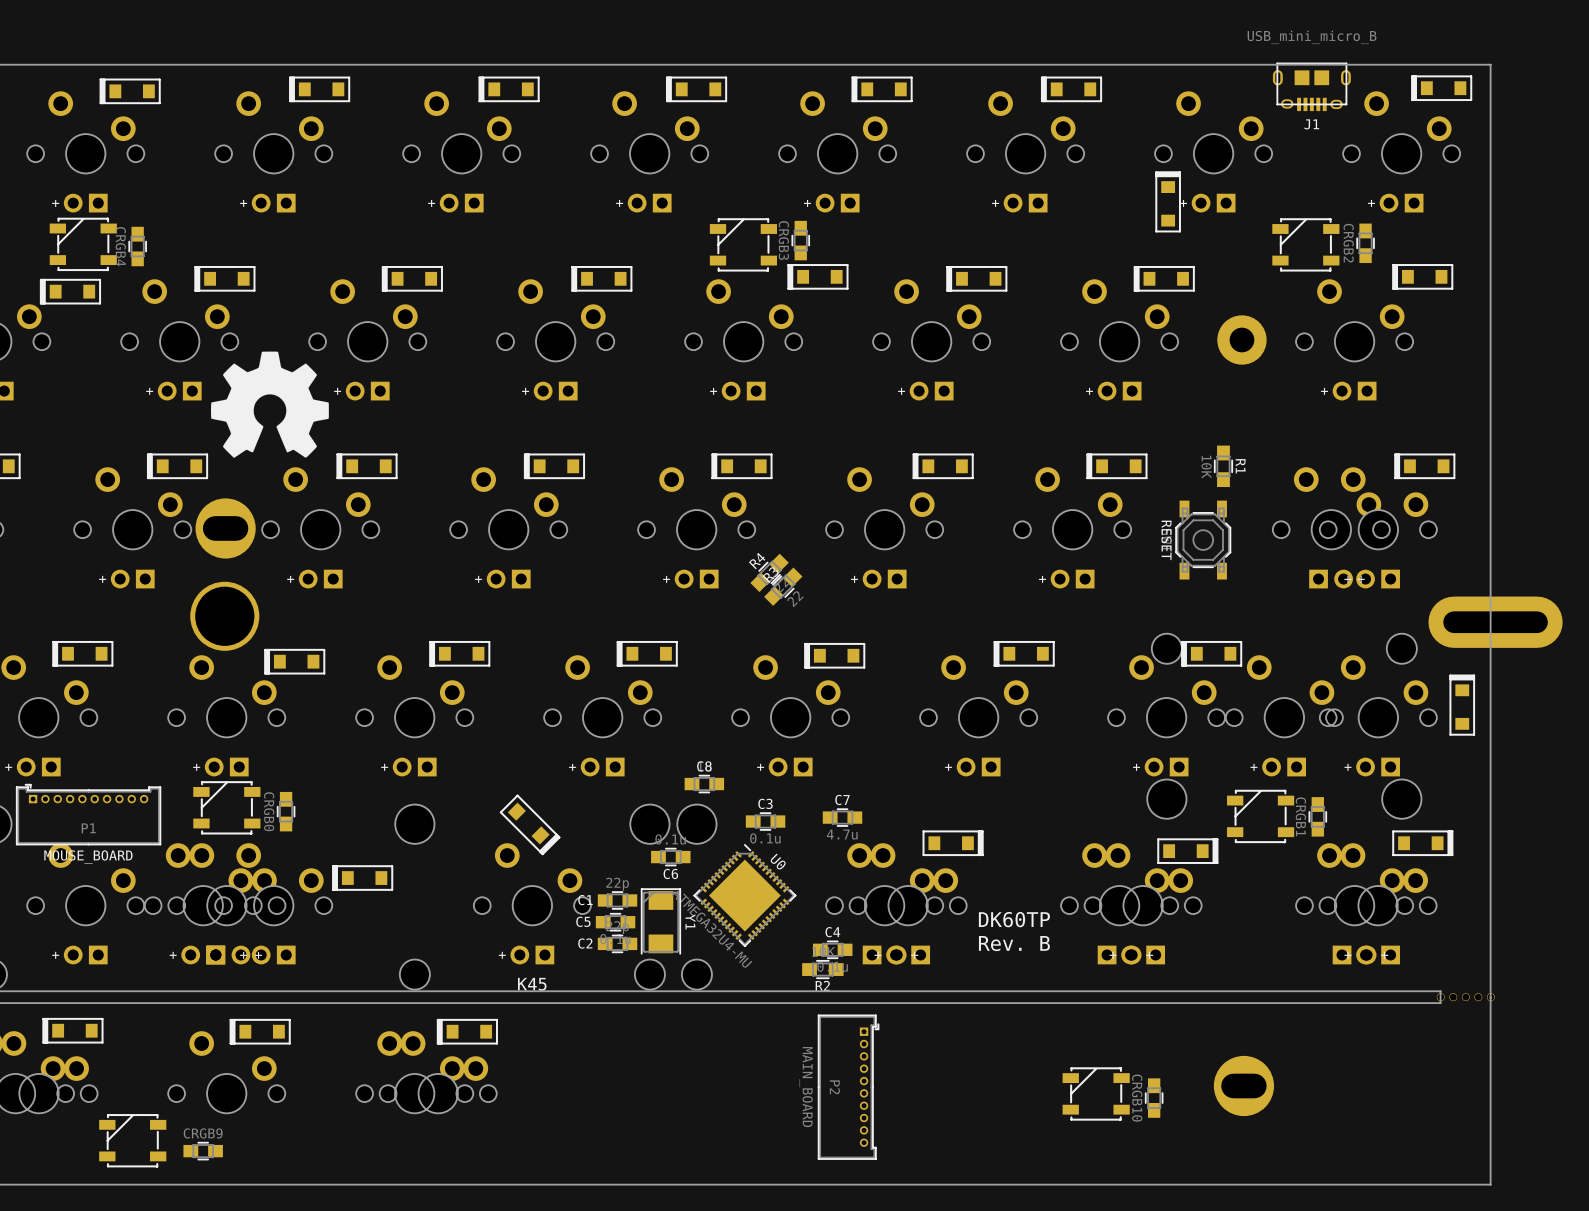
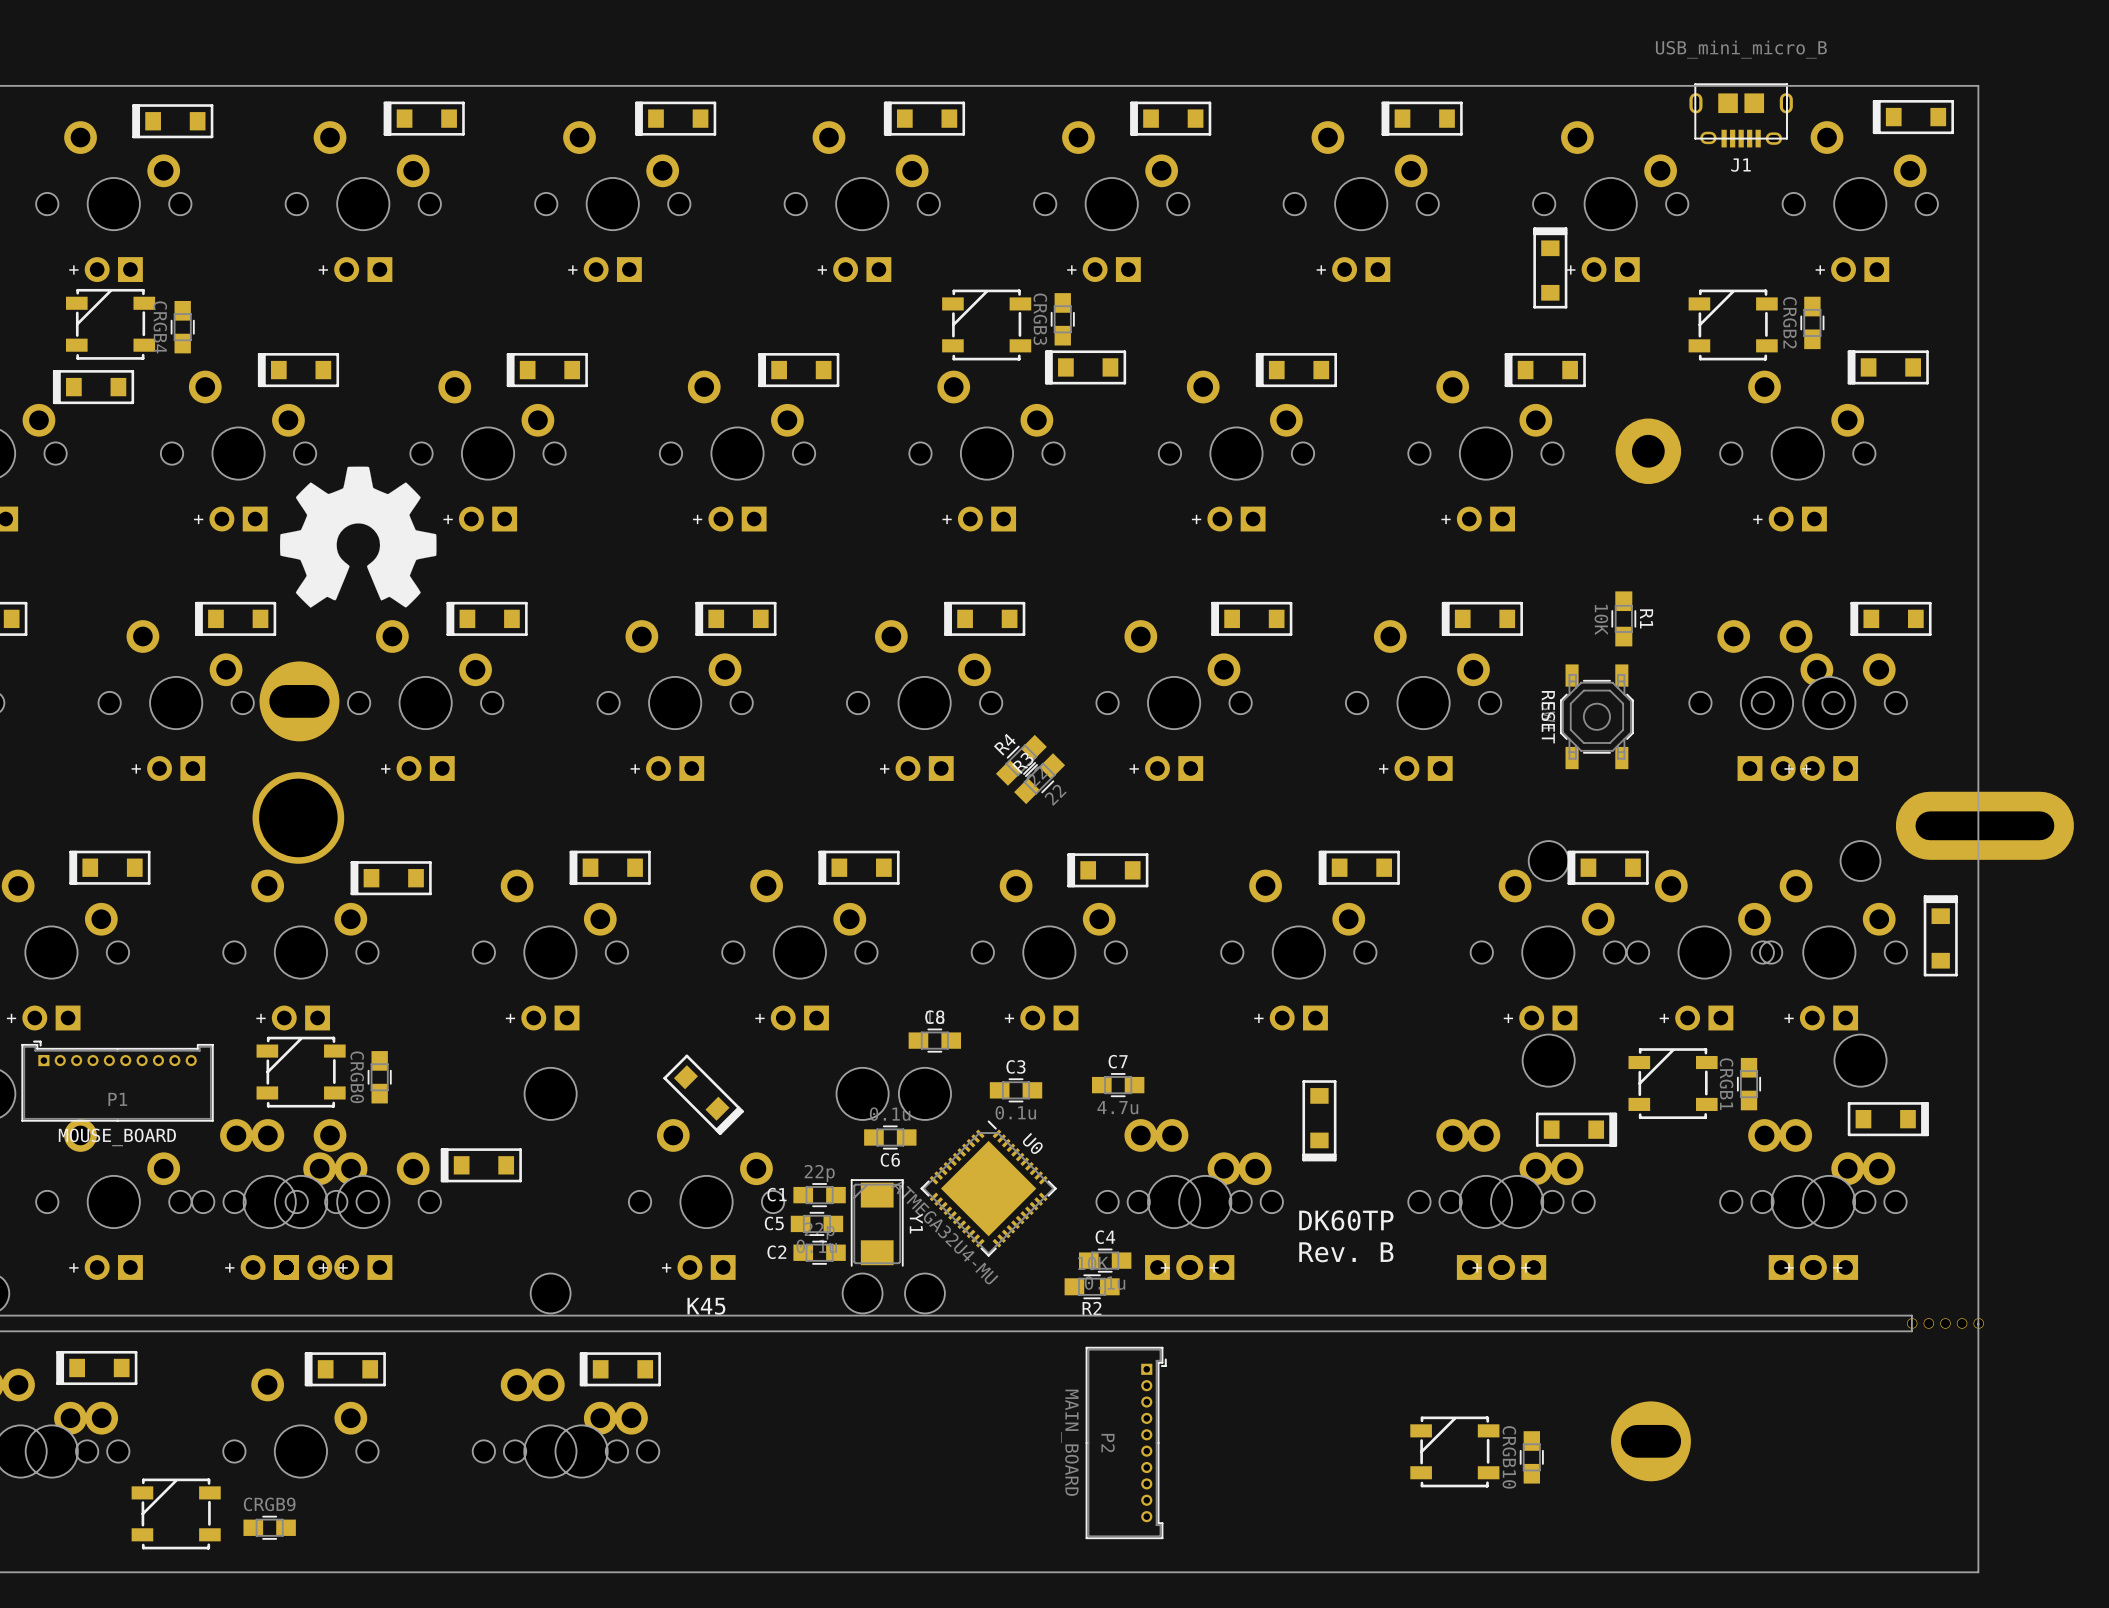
part rotation: 0° (953, 843) -> 90° clockwise (1319, 1120)
part position: (953, 843) -> (1319, 1120)

